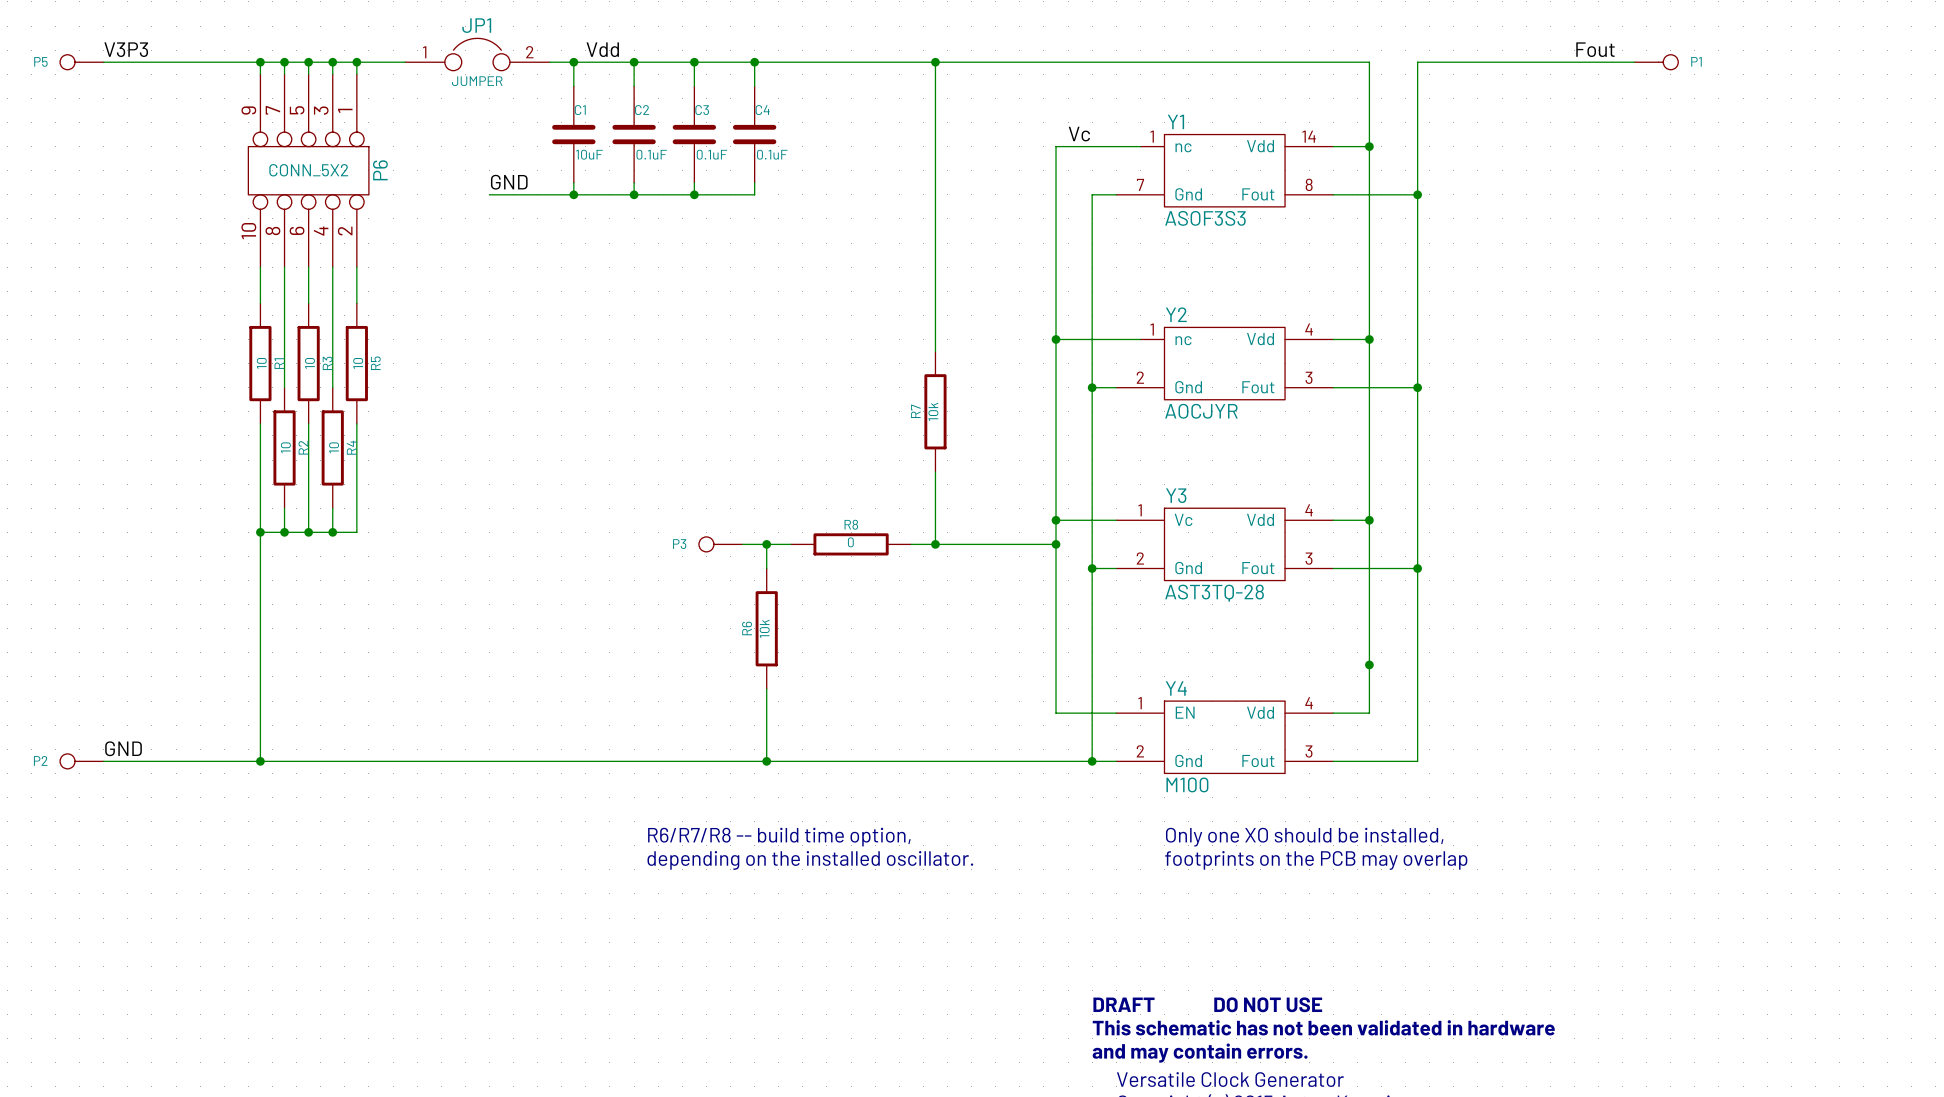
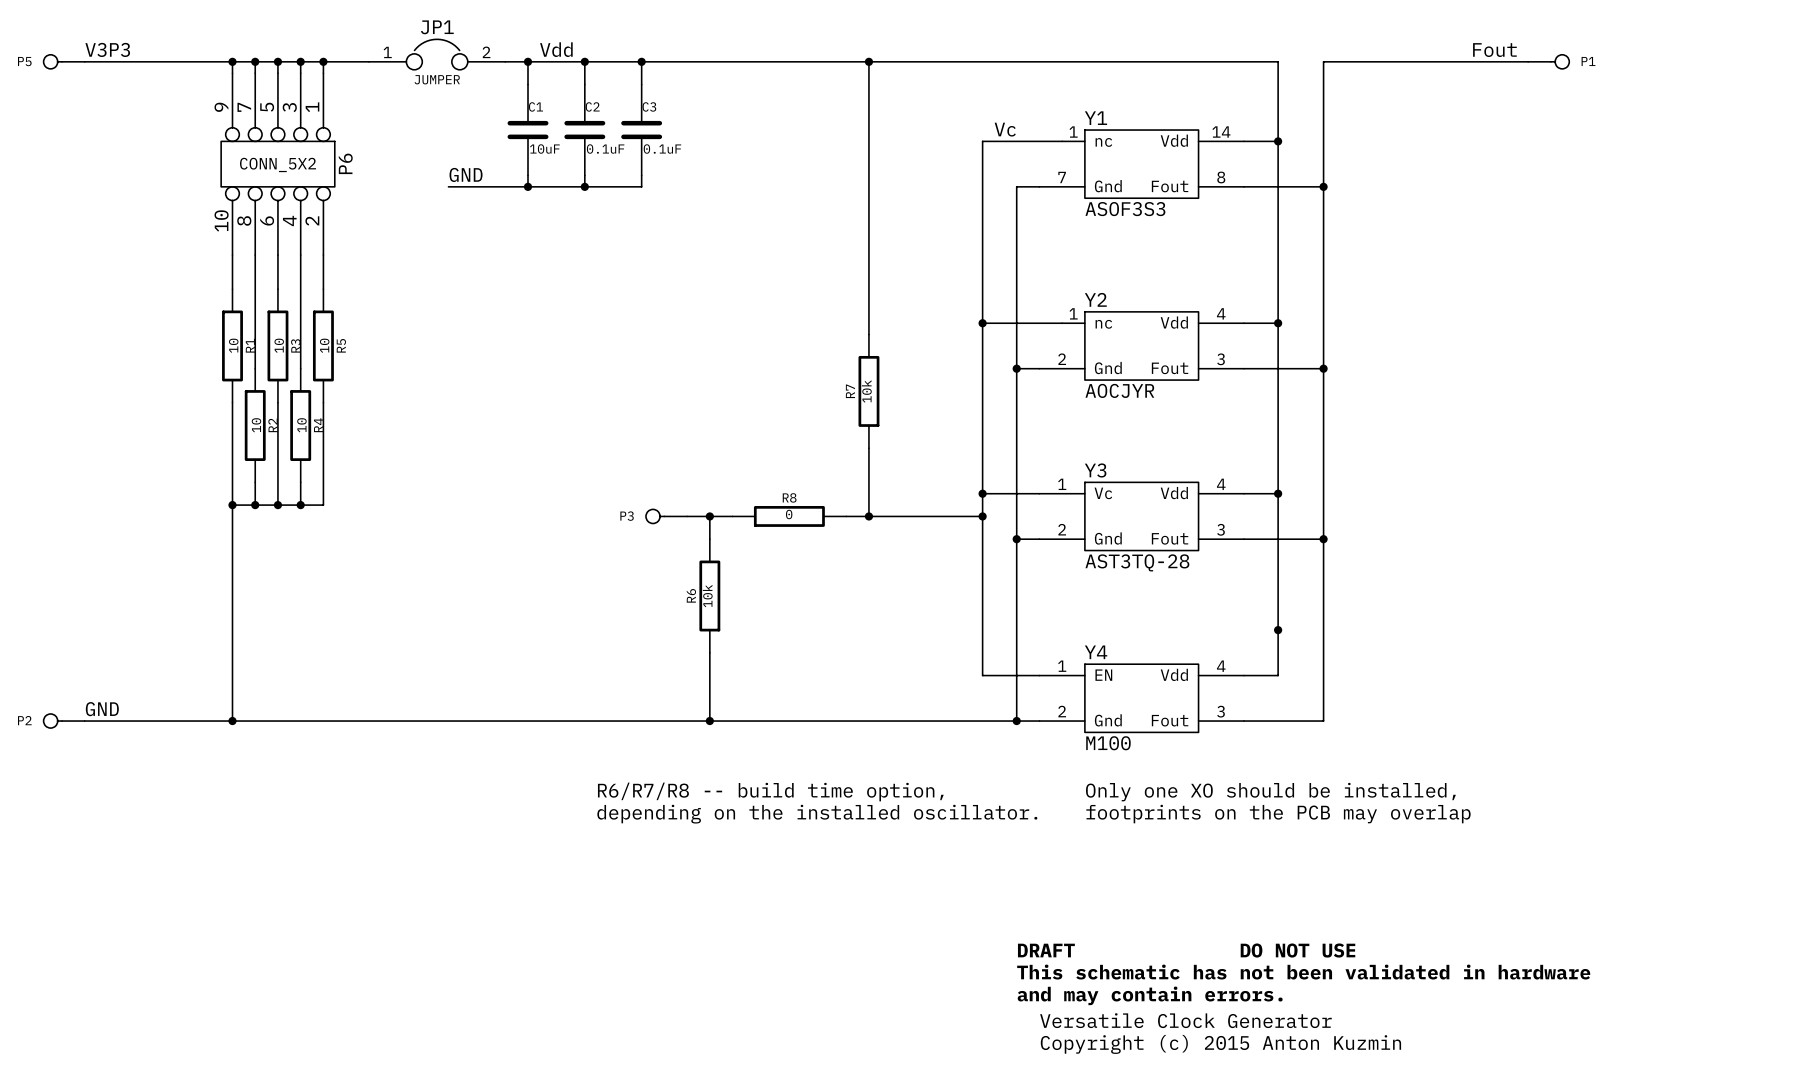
wire: (754, 62) (754, 86) -> none
junction: (754, 62) -> none
C4: 0.1uF (754, 134) -> none
wire: (754, 182) (754, 194) (694, 194) -> none
junction: (694, 194) -> none

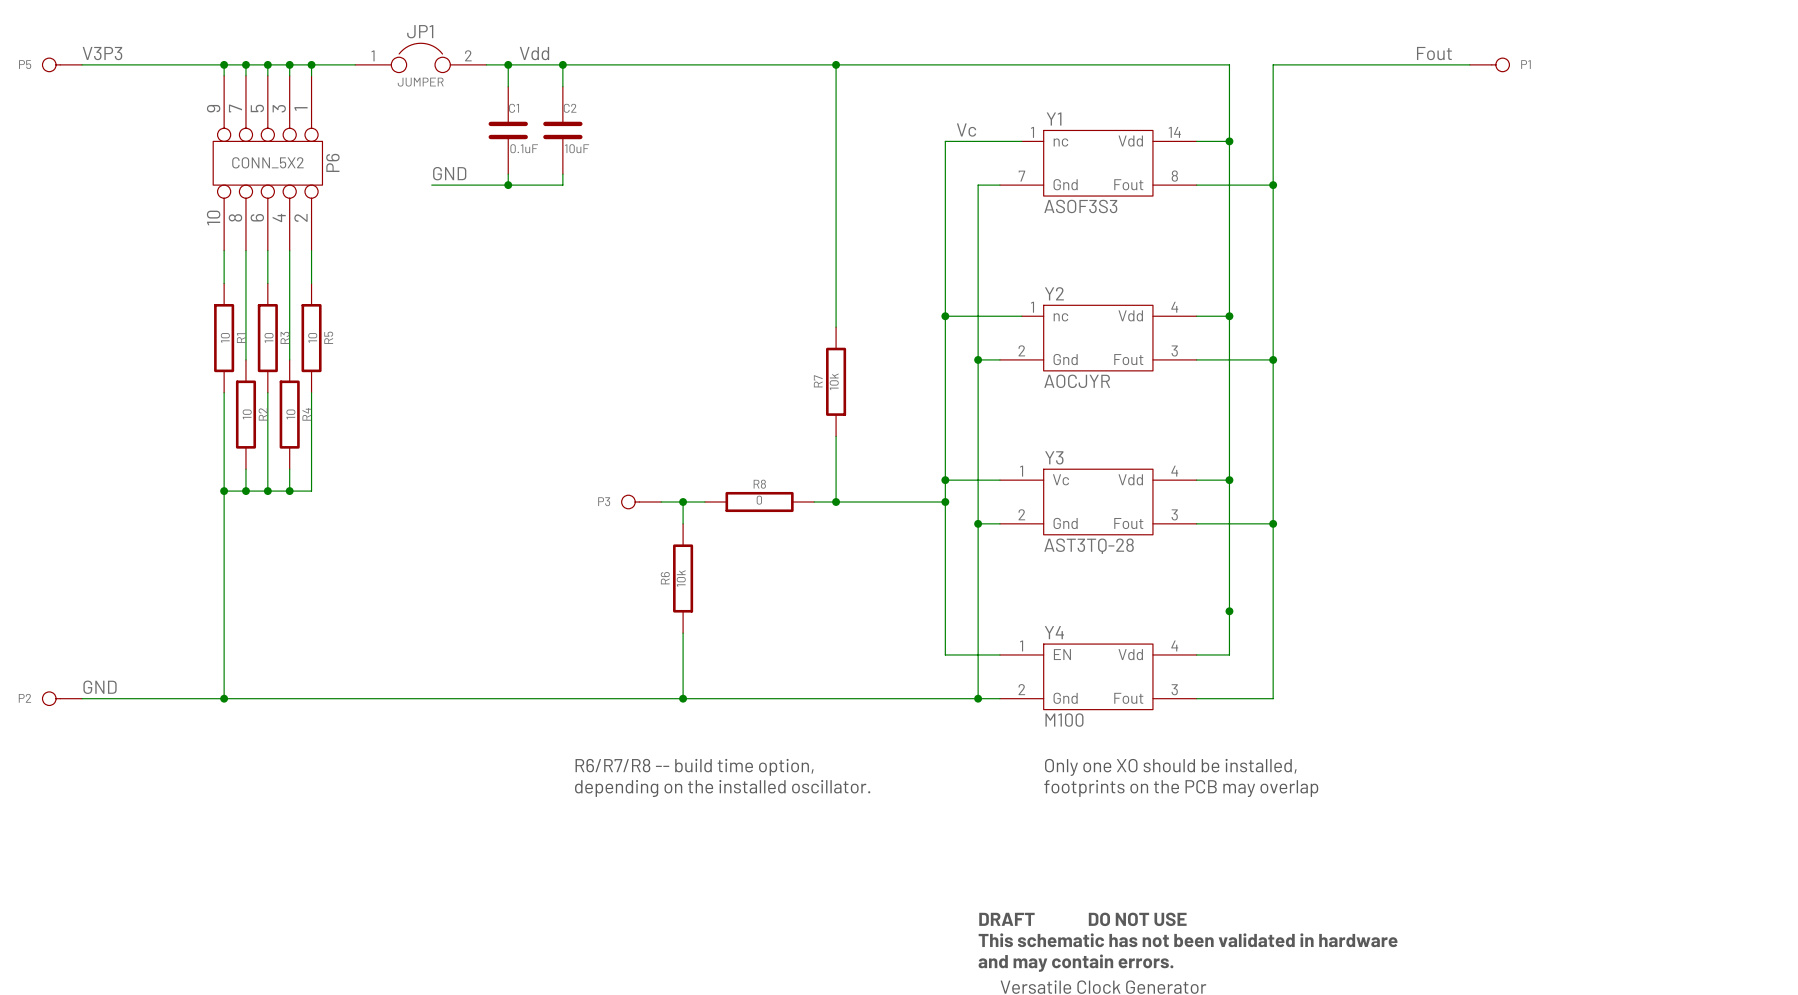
wire: (641, 61) (641, 84) -> none
junction: (641, 61) -> none
C3: 0.1uF (641, 130) -> none
C1 value: 10uF (544, 149) -> 0.1uF (524, 148)
C2 value: 0.1uF (605, 149) -> 10uF (577, 148)
wire: (641, 175) (641, 186) (584, 186) -> none
junction: (584, 186) -> none

